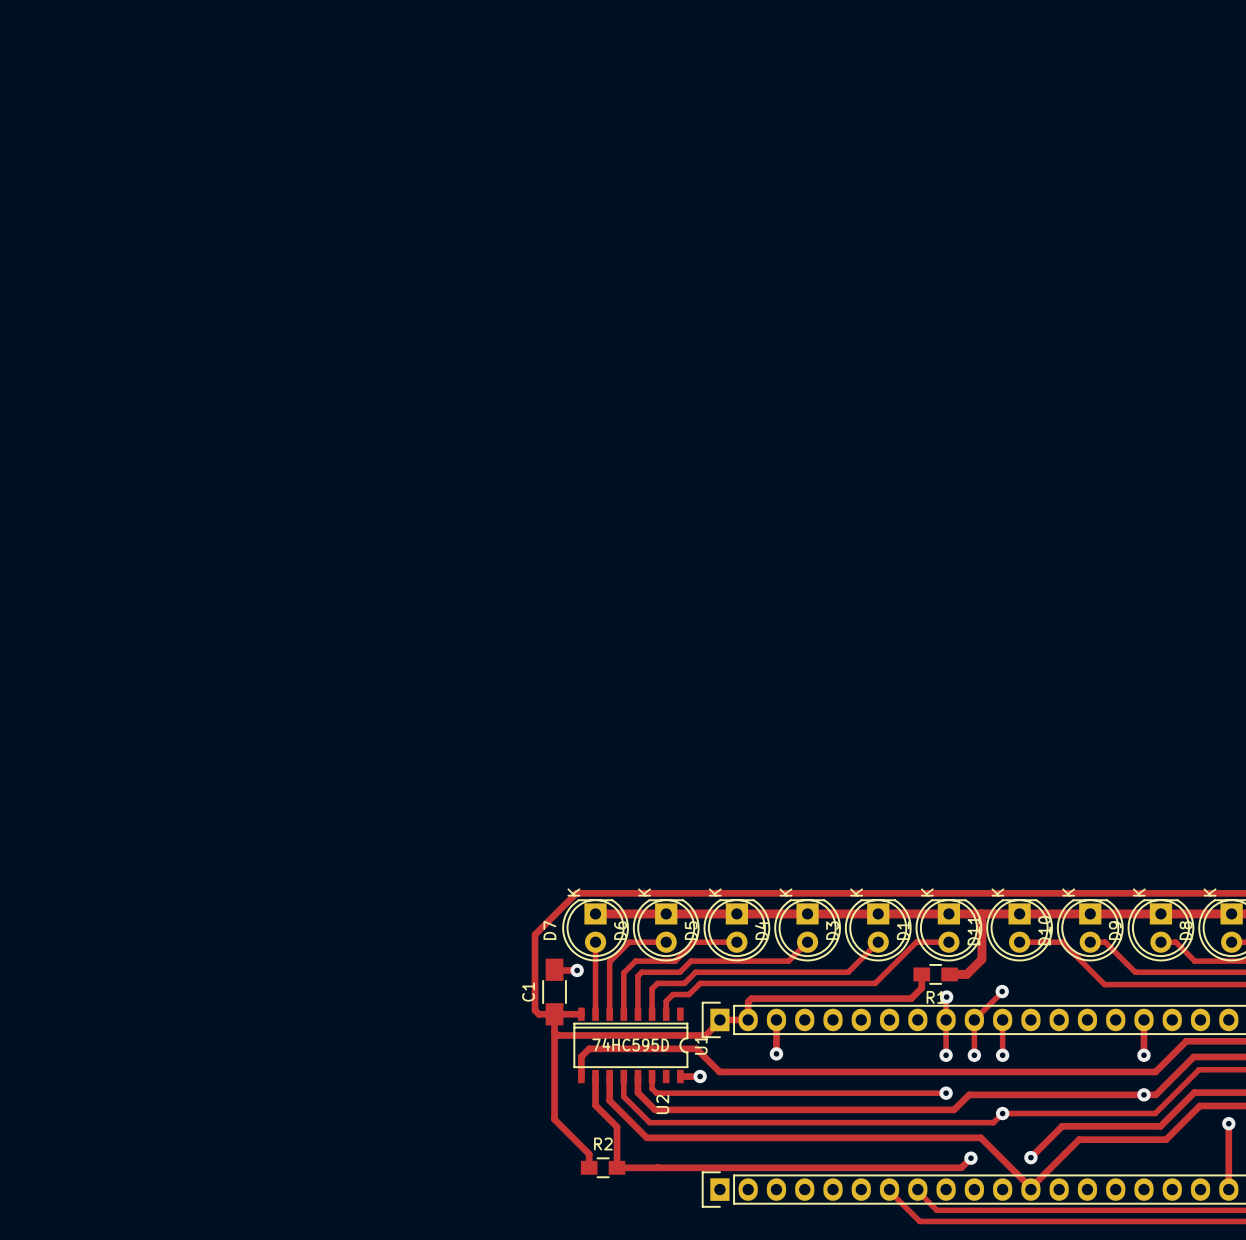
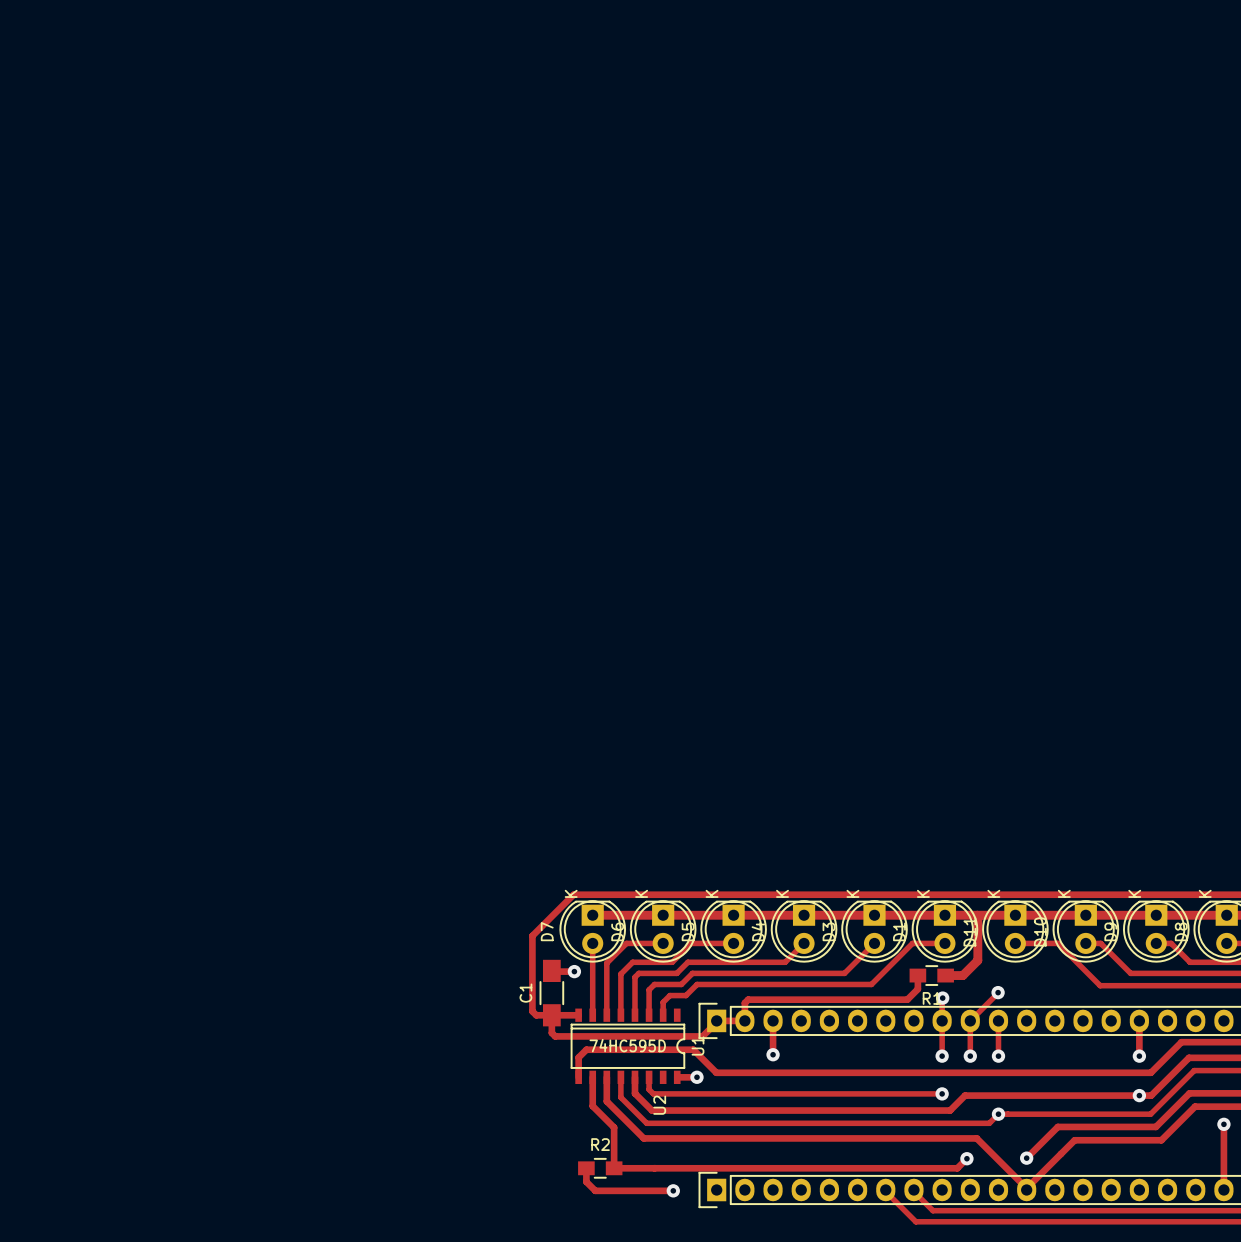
track: (554, 1032) (554, 1119) (589, 1154) (589, 1167) -> (673, 1190) (595, 1190) (586, 1181) (586, 1168)
via: none -> (673, 1190)

